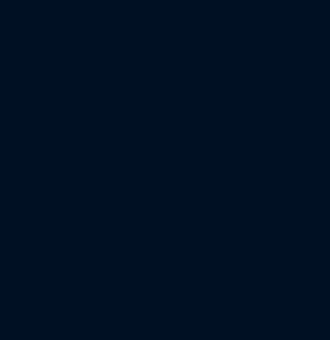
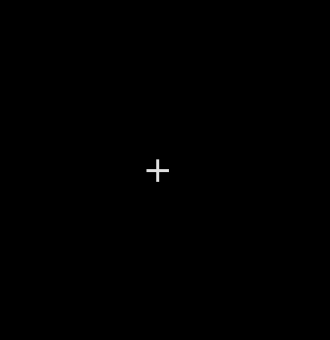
text: none -> + (157, 170)

